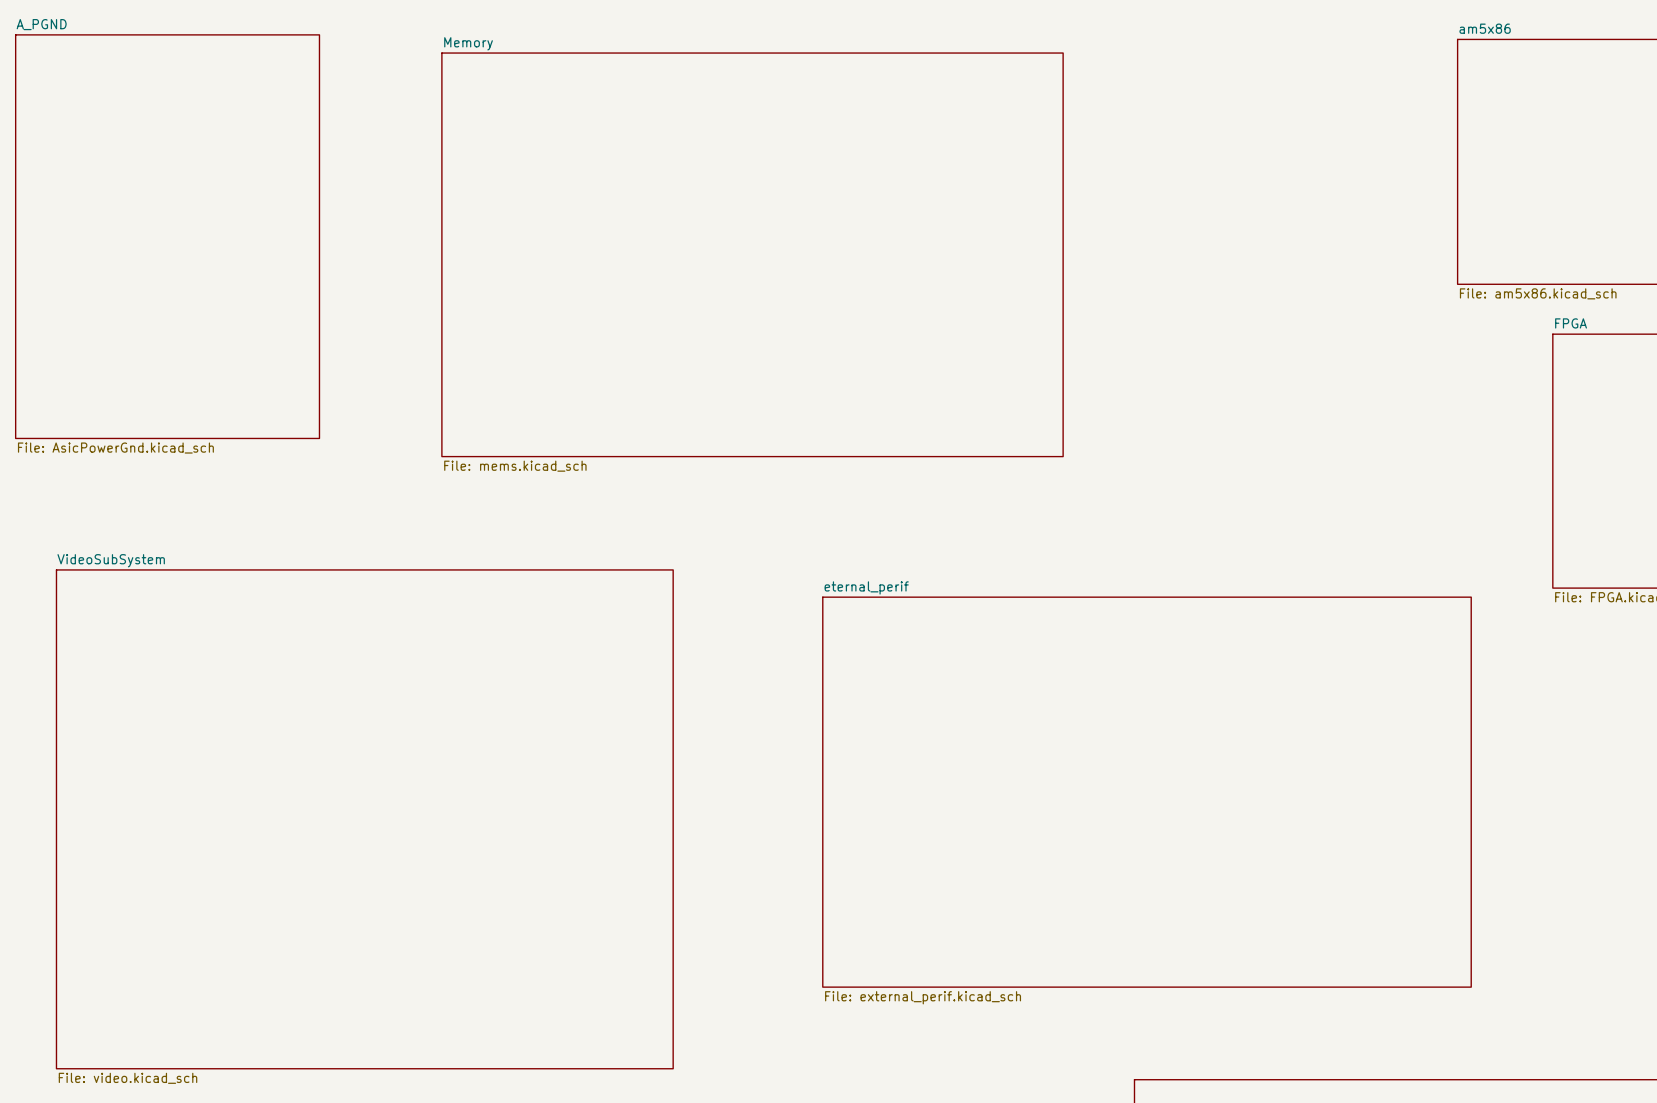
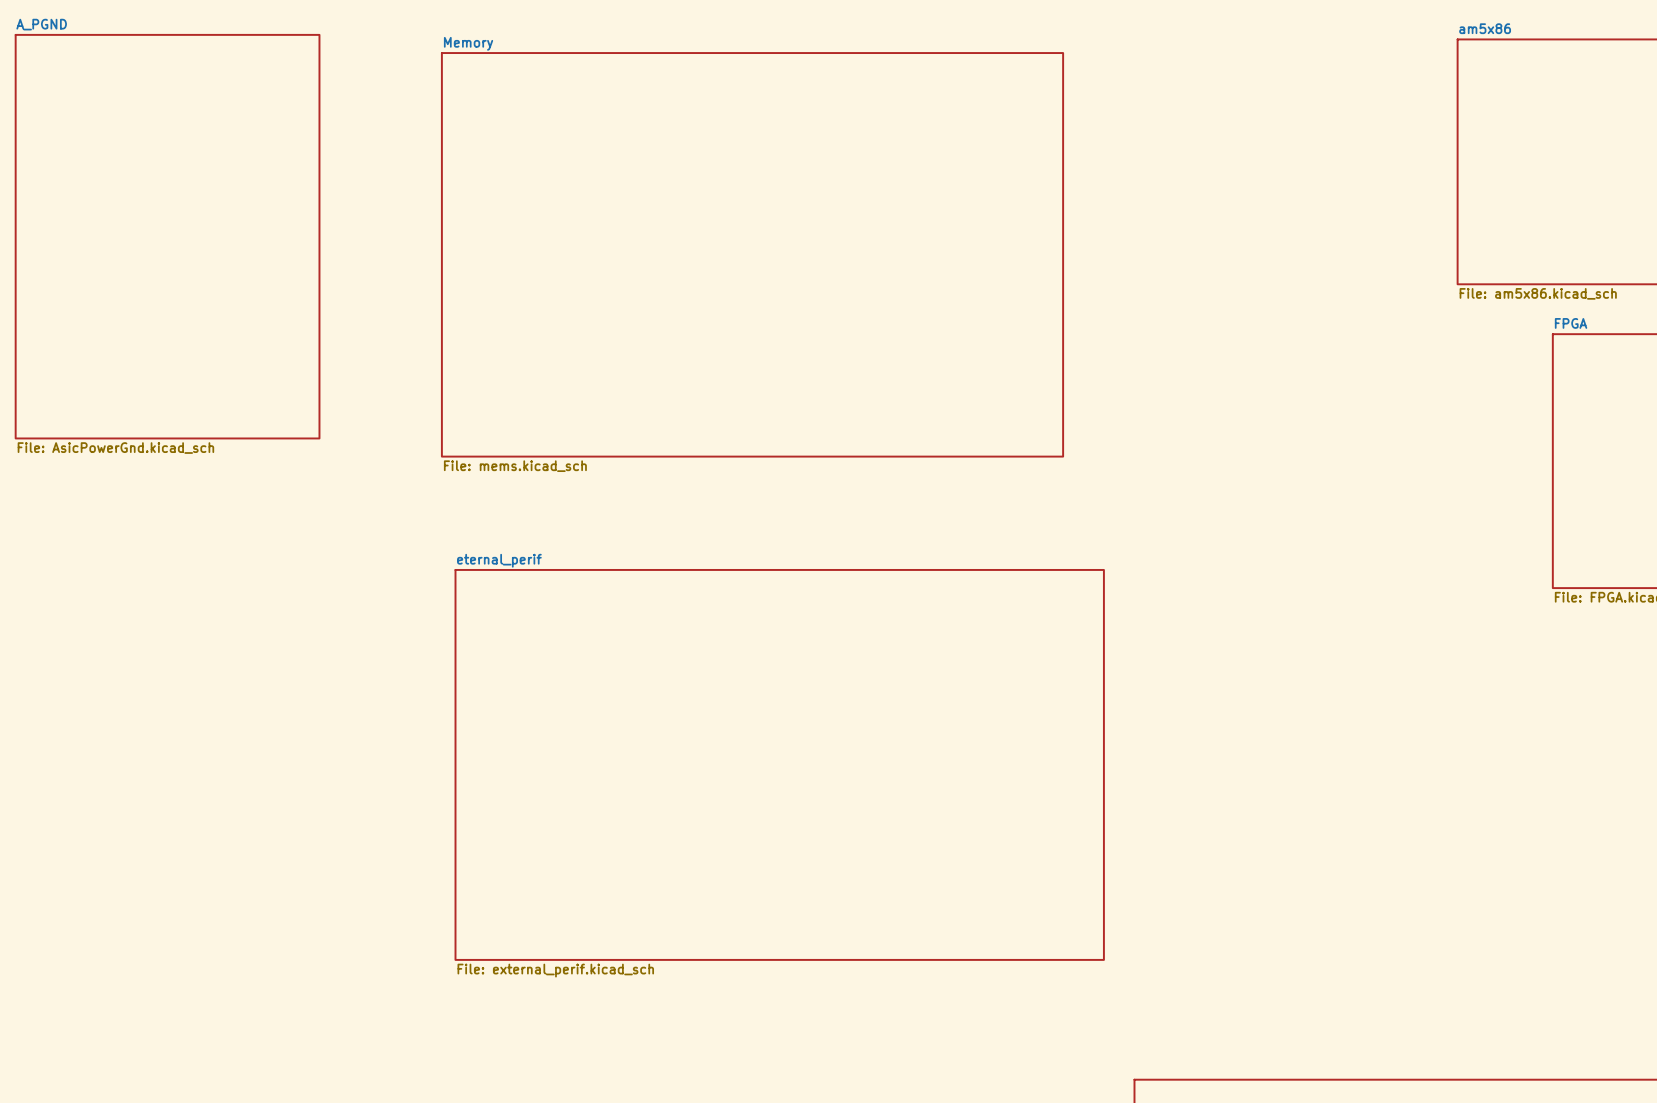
sheet eternal_perif: none -> File: external_perif.kicad_sch (779, 764)
sheet eternal_perif: File: external_perif.kicad_sch (1147, 792) -> none
sheet VideoSubSystem: File: video.kicad_sch (364, 819) -> none

